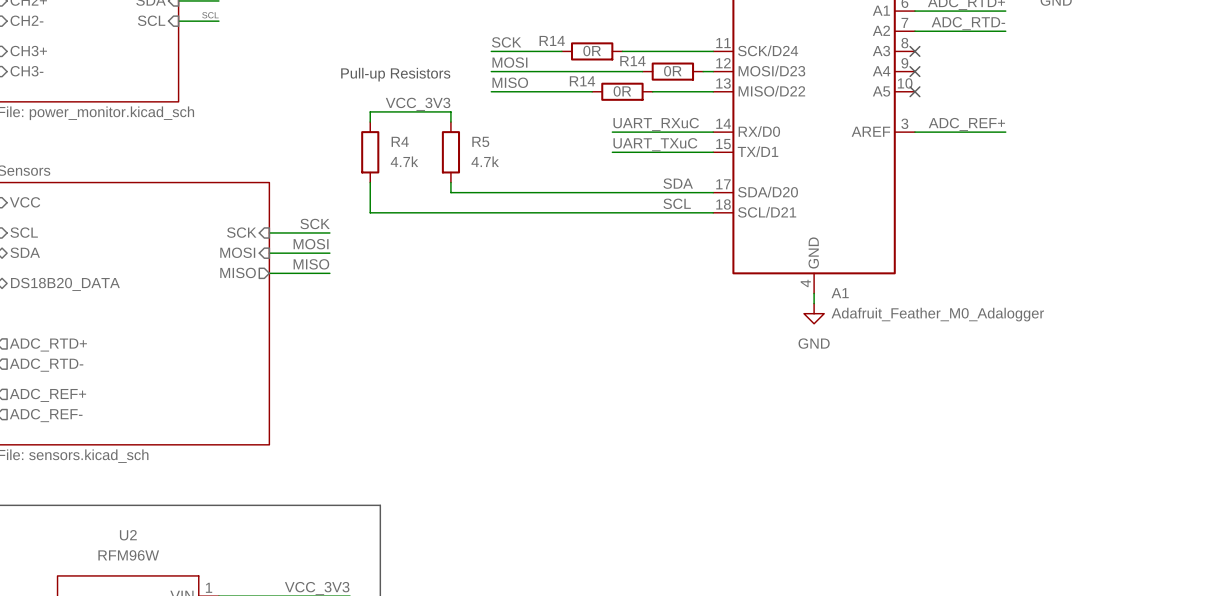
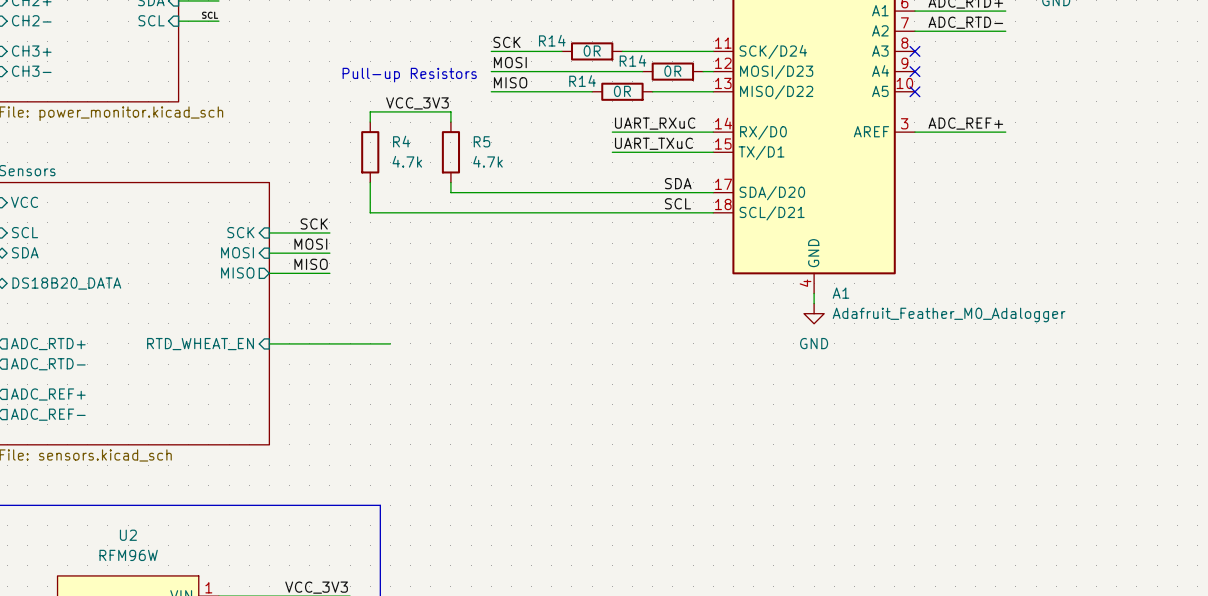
wire: none -> (269, 343) (390, 343)
sheet pin: none -> RTD_WHEAT_EN (200, 344)

